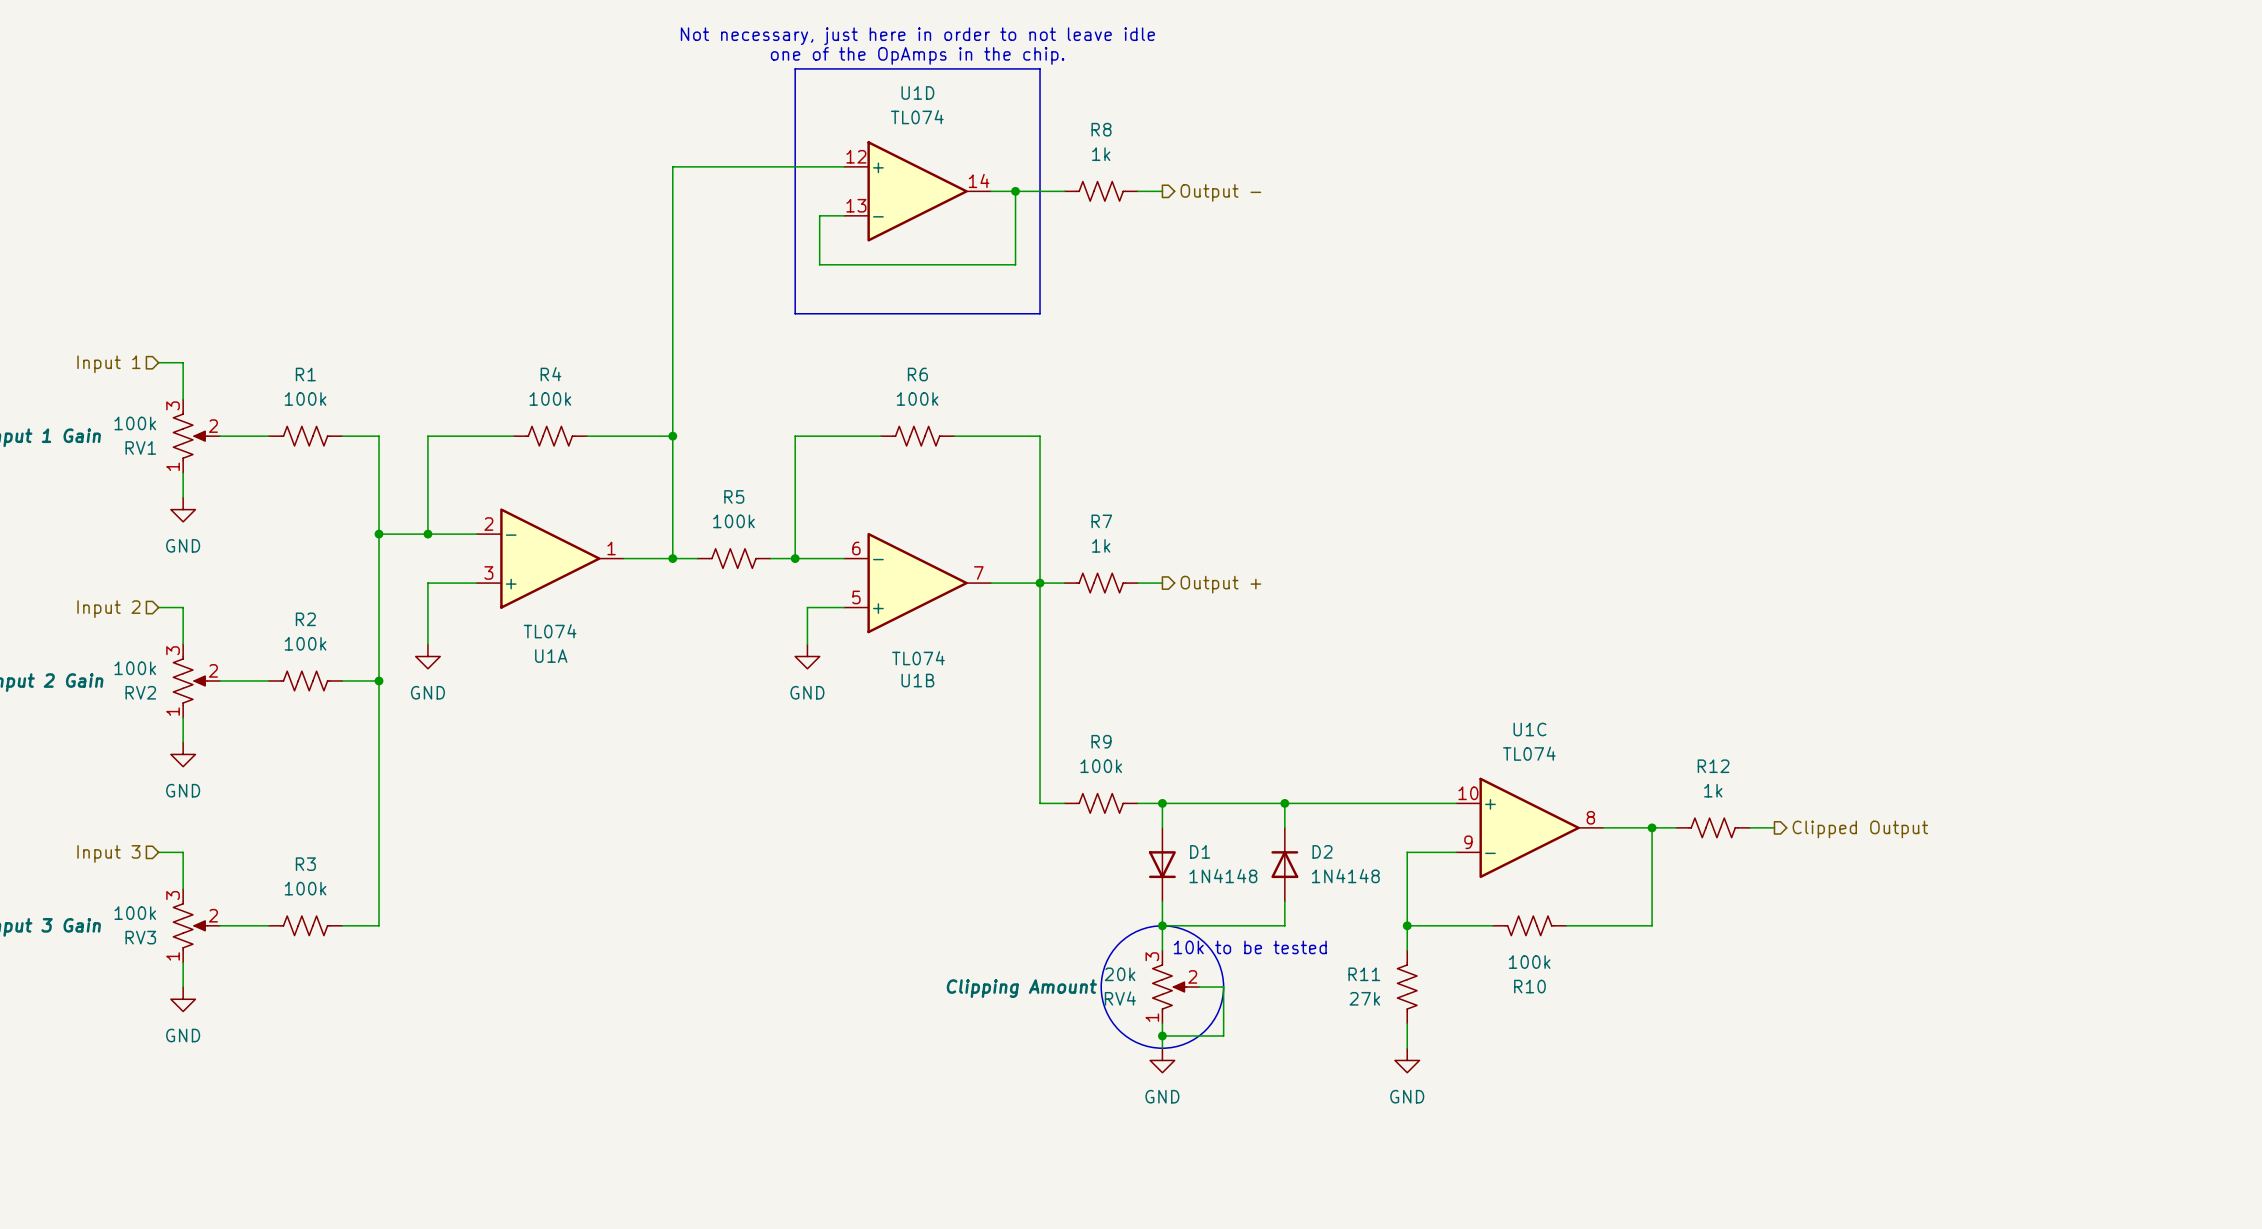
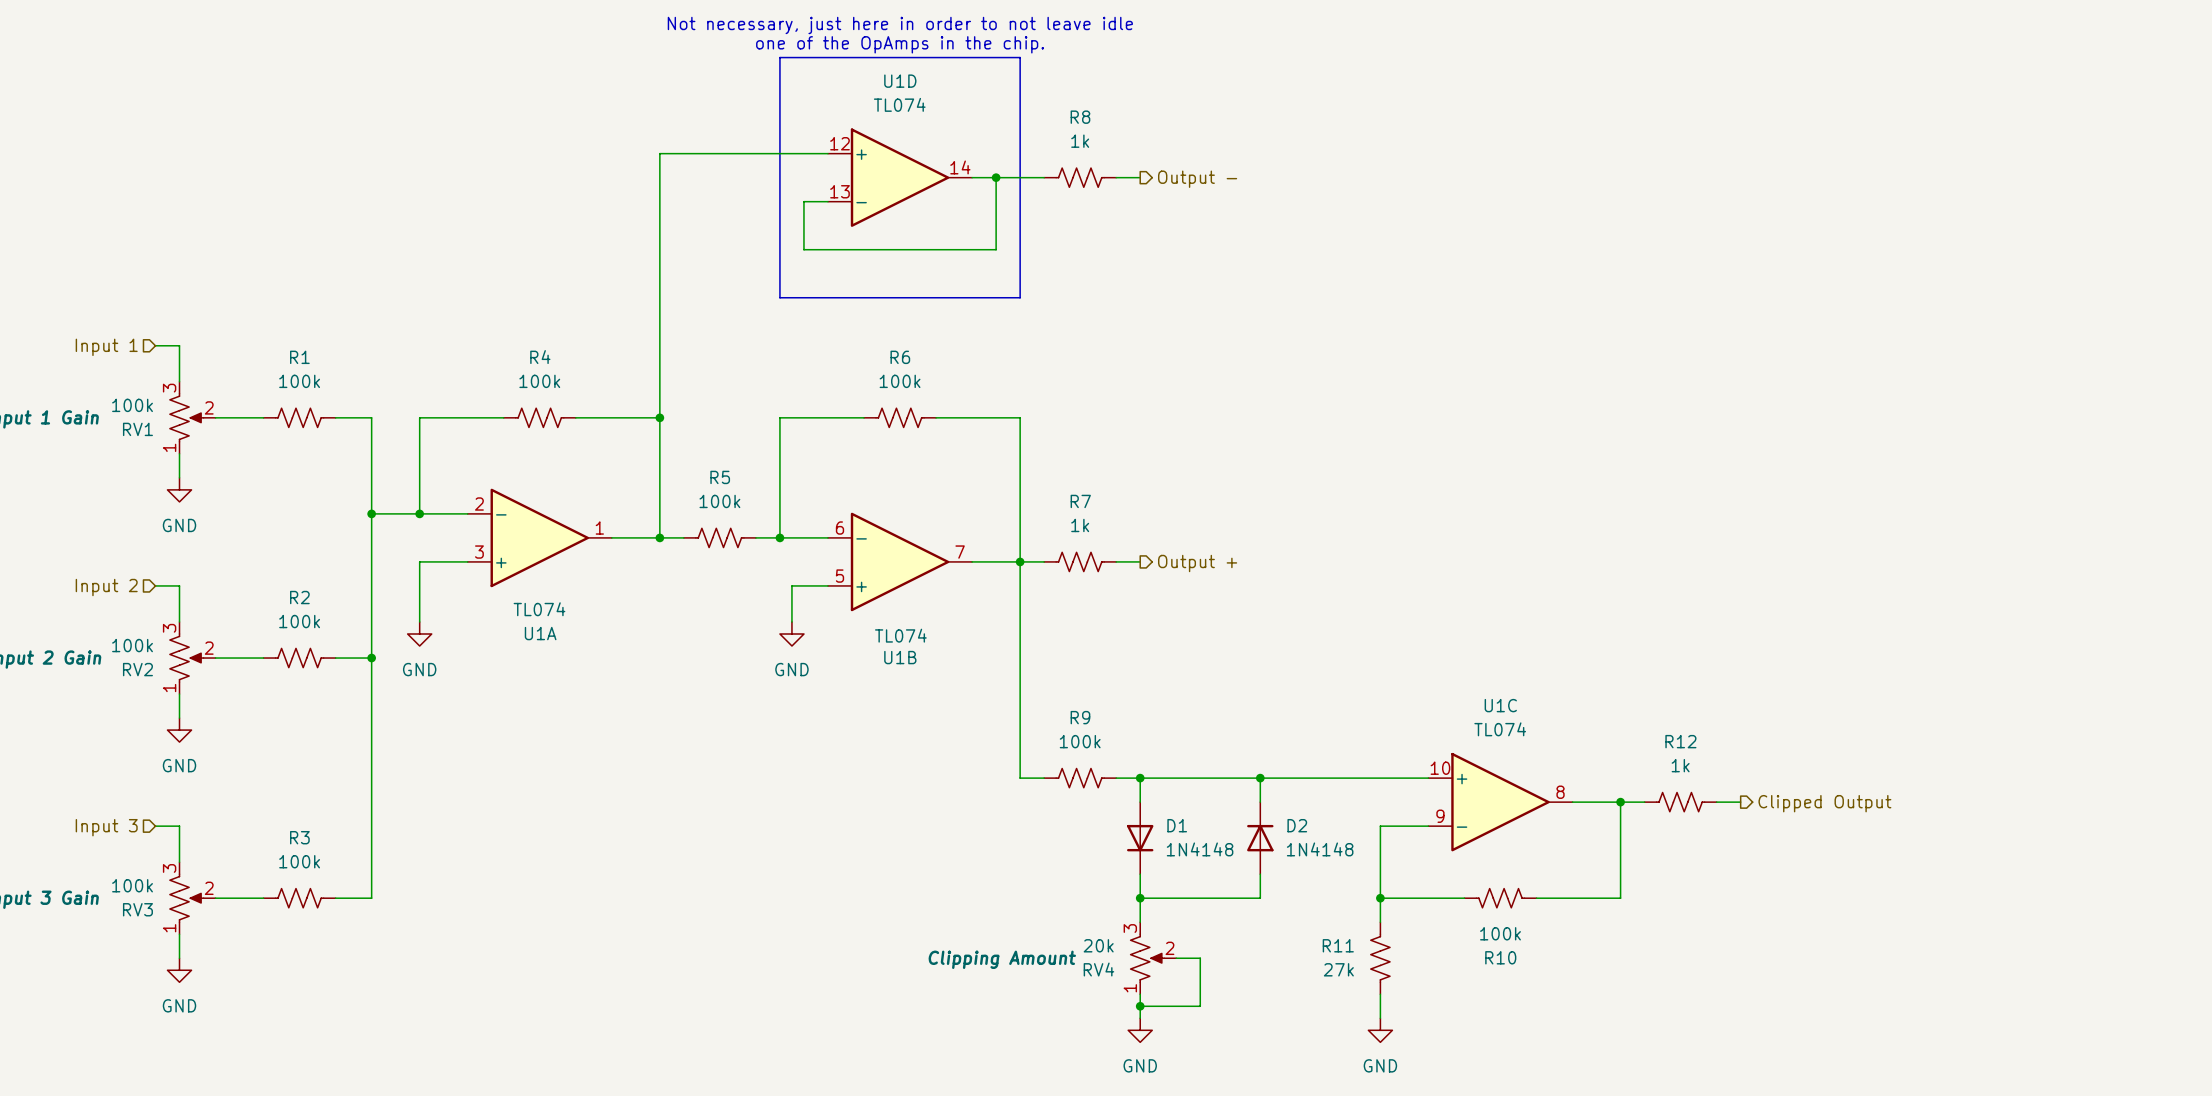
drawing: [1101, 925, 1224, 1049] -> none
text: 10k to be tested (1250, 947) -> none

